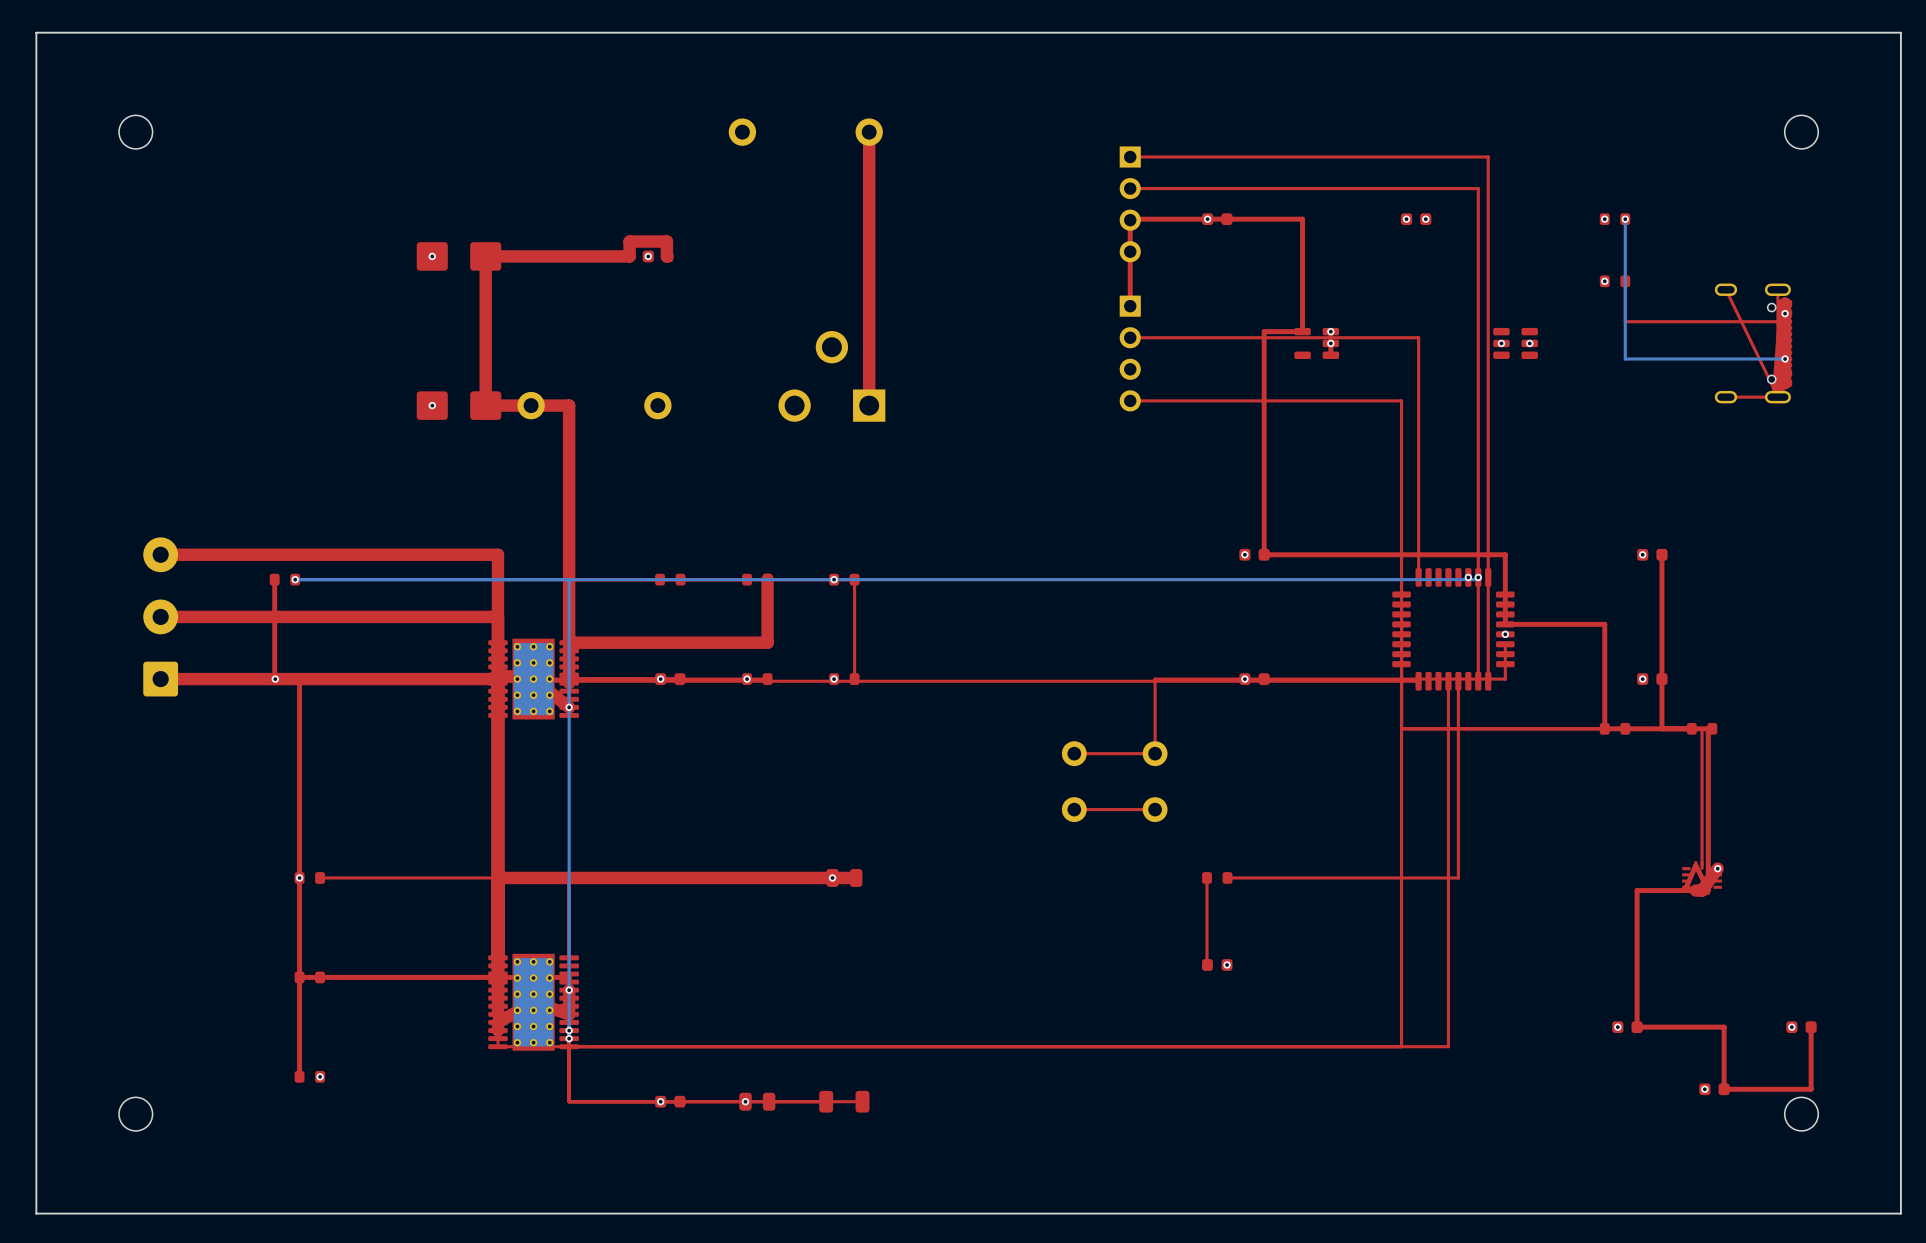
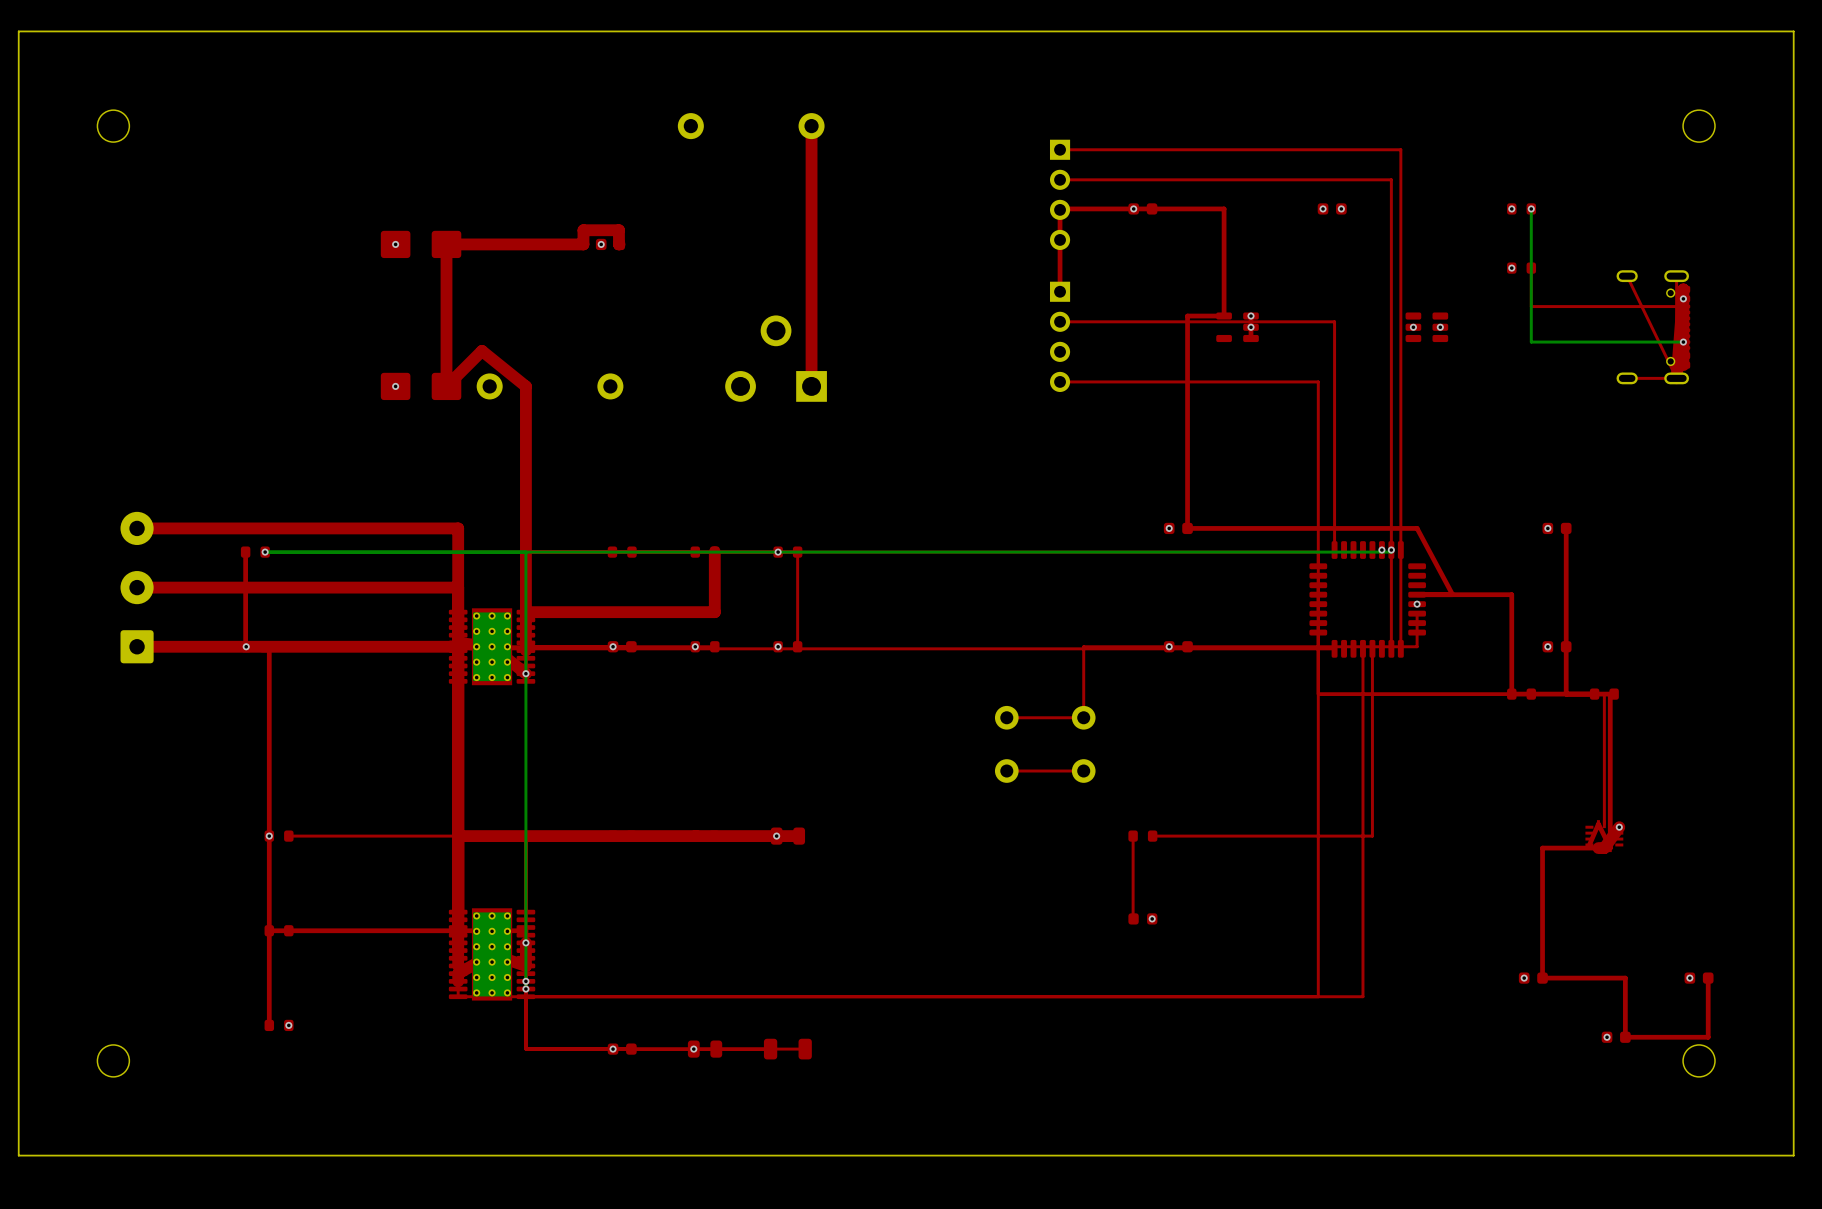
top track: (569, 405) (485, 405) -> (525, 386) (481, 350) (446, 386)
top track: (1505, 554) (1505, 624) -> (1417, 528) (1452, 594)

